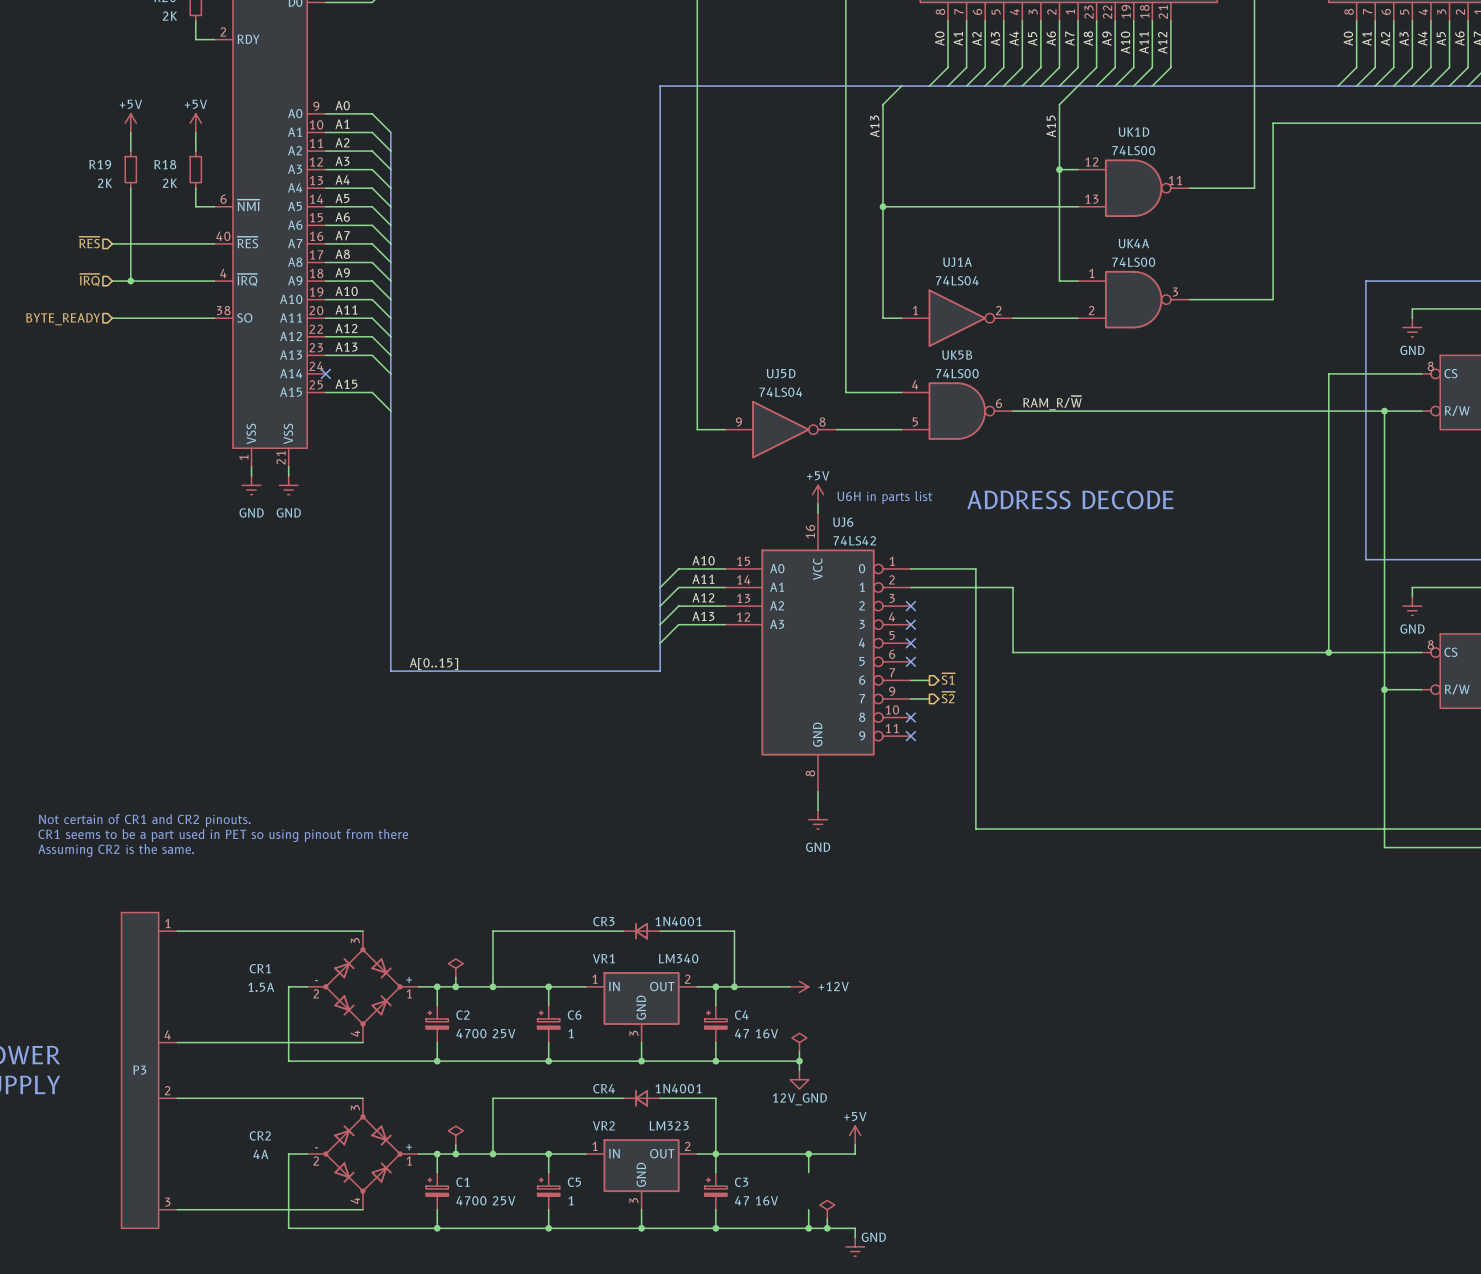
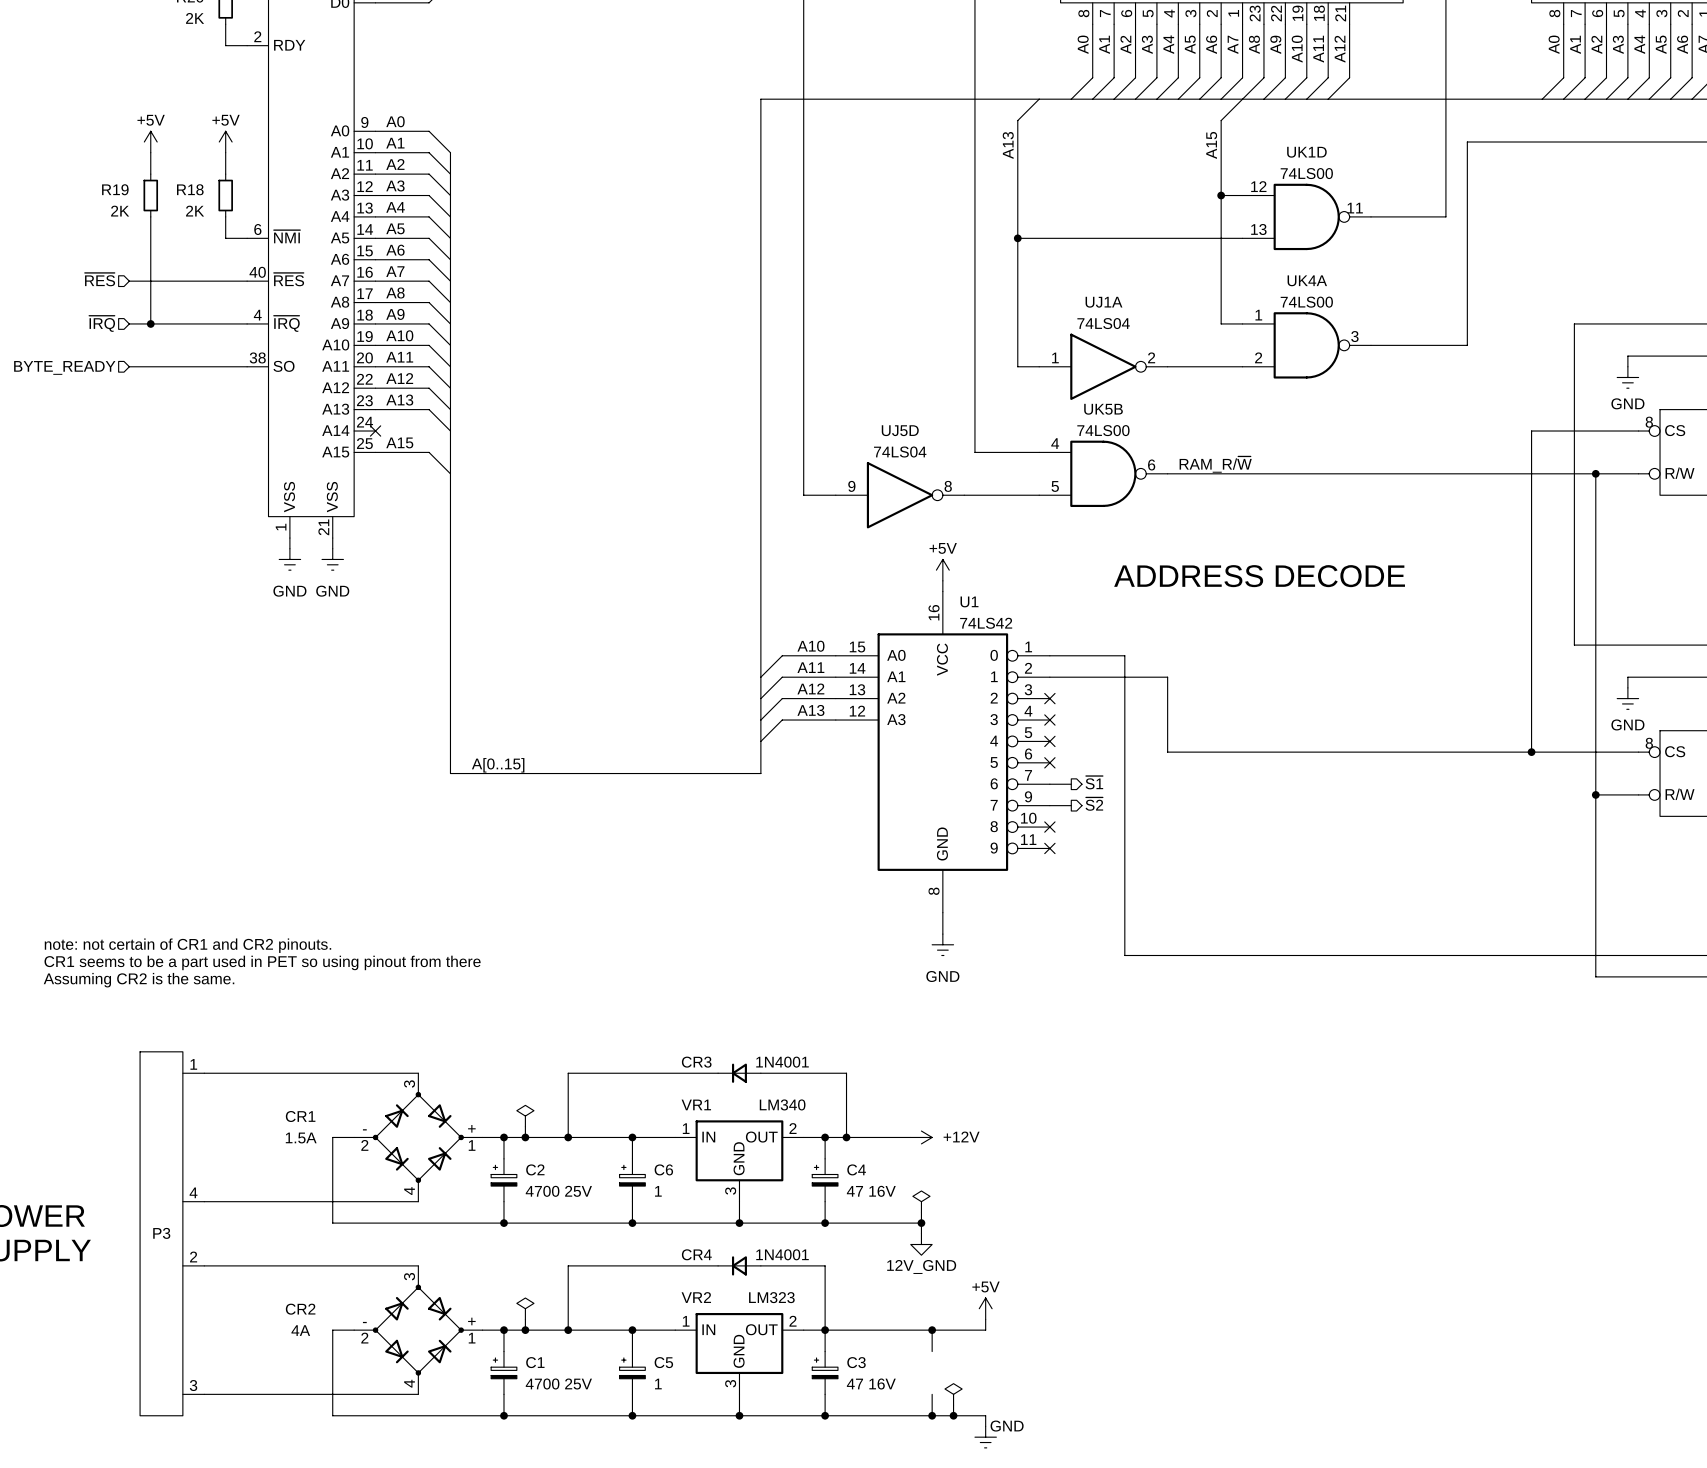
text: U6H in parts list (884, 497) -> none
UJ6 name: UJ6 (843, 522) -> U1 (969, 601)
text: Not certain of CR1 and CR2 pinouts. (144, 820) -> note: not certain of CR1 and CR2 pinouts. (187, 945)

